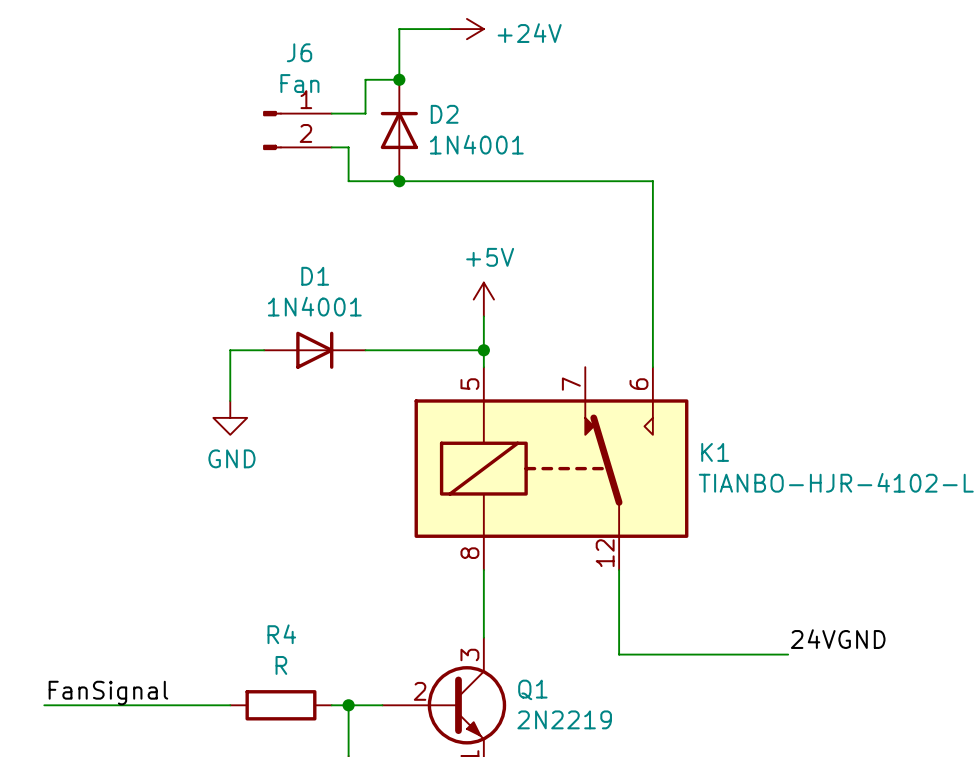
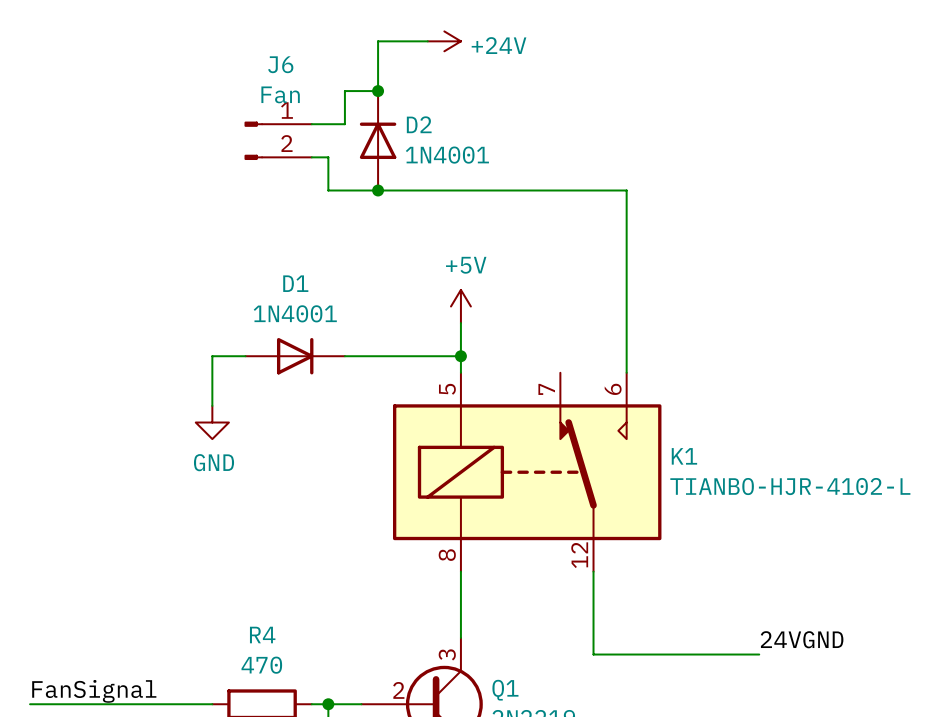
R4 value: R (281, 665) -> 470 (261, 665)

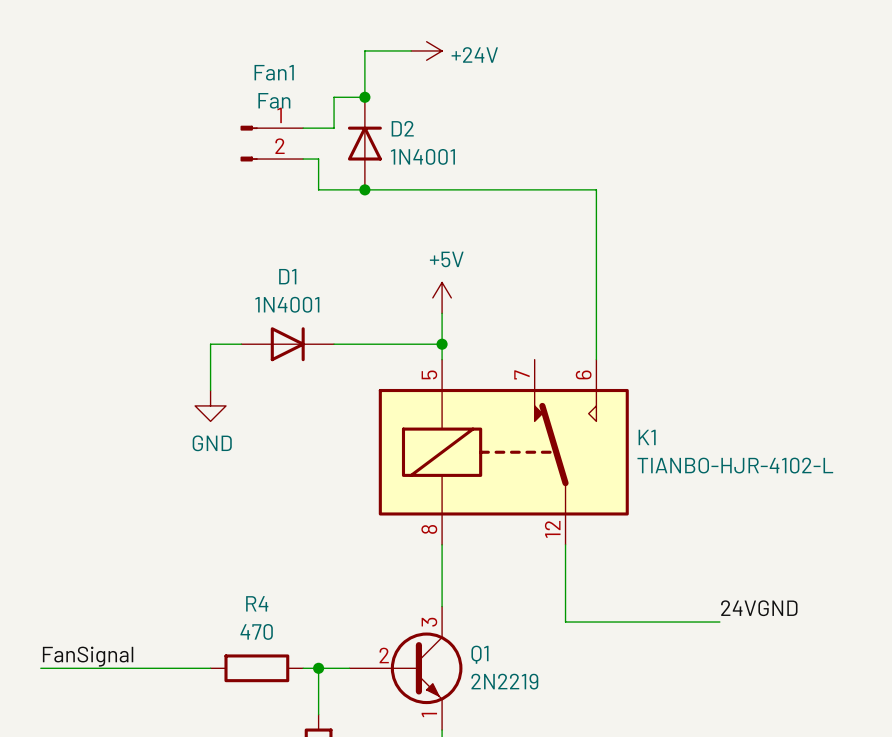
J6 name: J6 (280, 64) -> Fan1 (274, 72)

